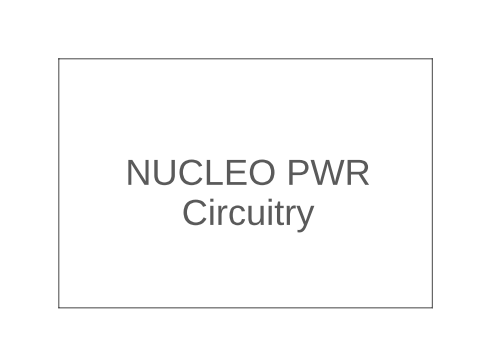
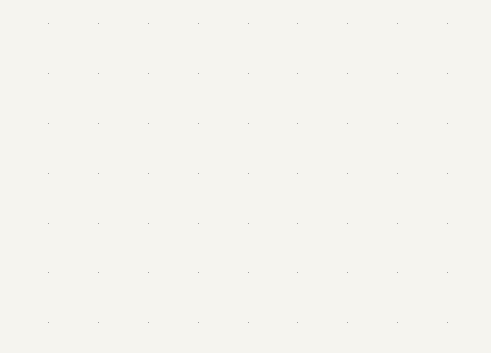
line: (58, 58) (432, 58) (432, 307) (58, 307) (58, 58) -> none
text: NUCLEO PWR (248, 172) -> none
text: Circuitry (248, 215) -> none

